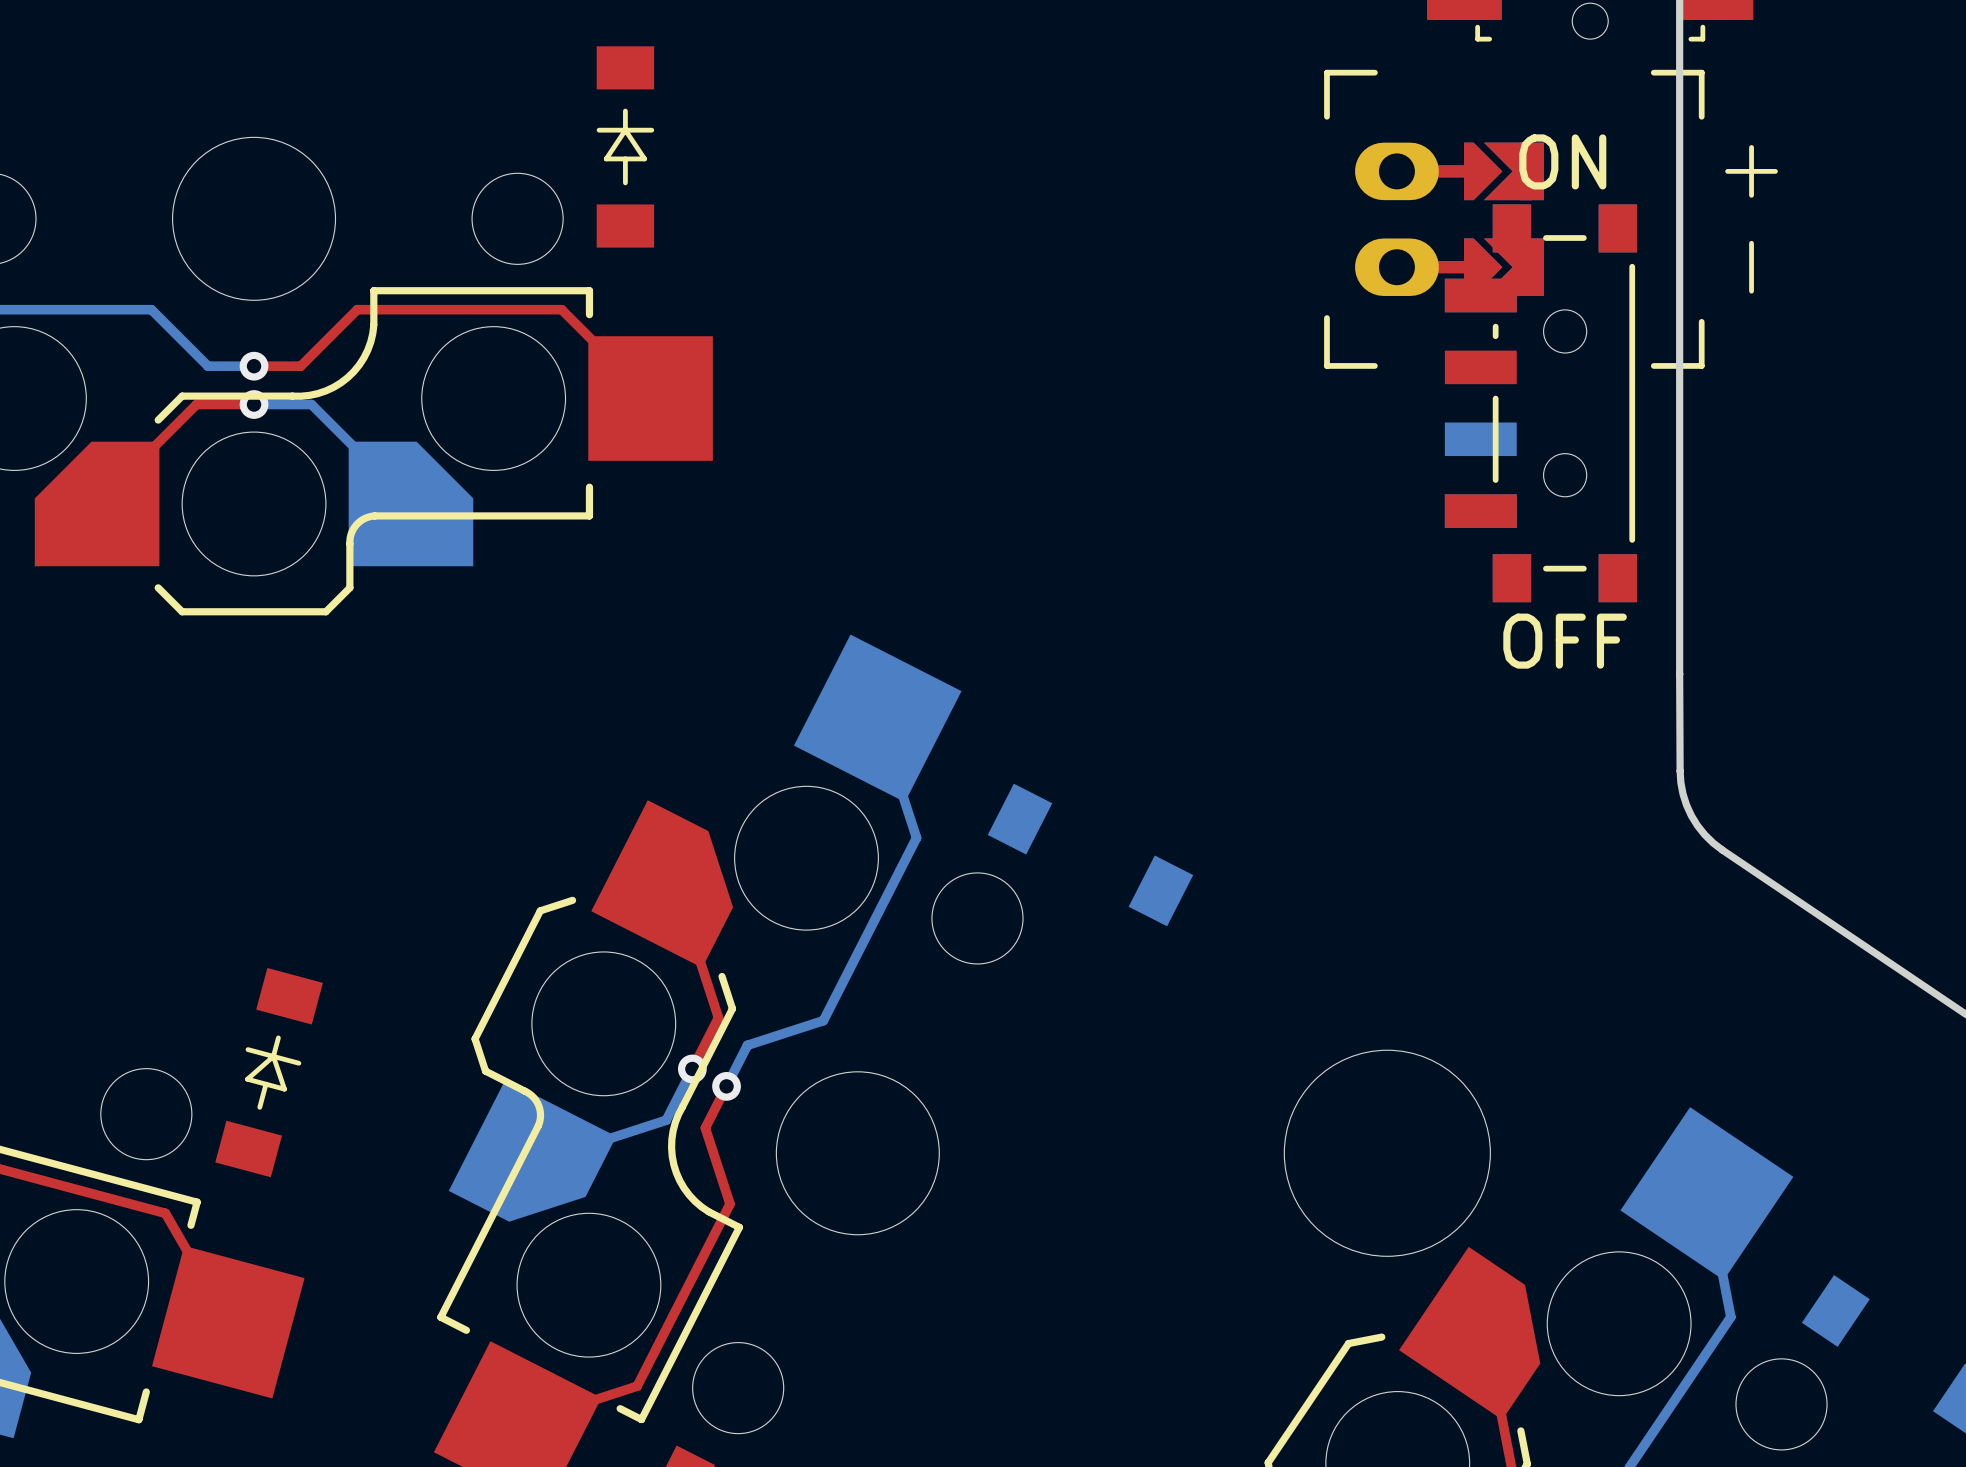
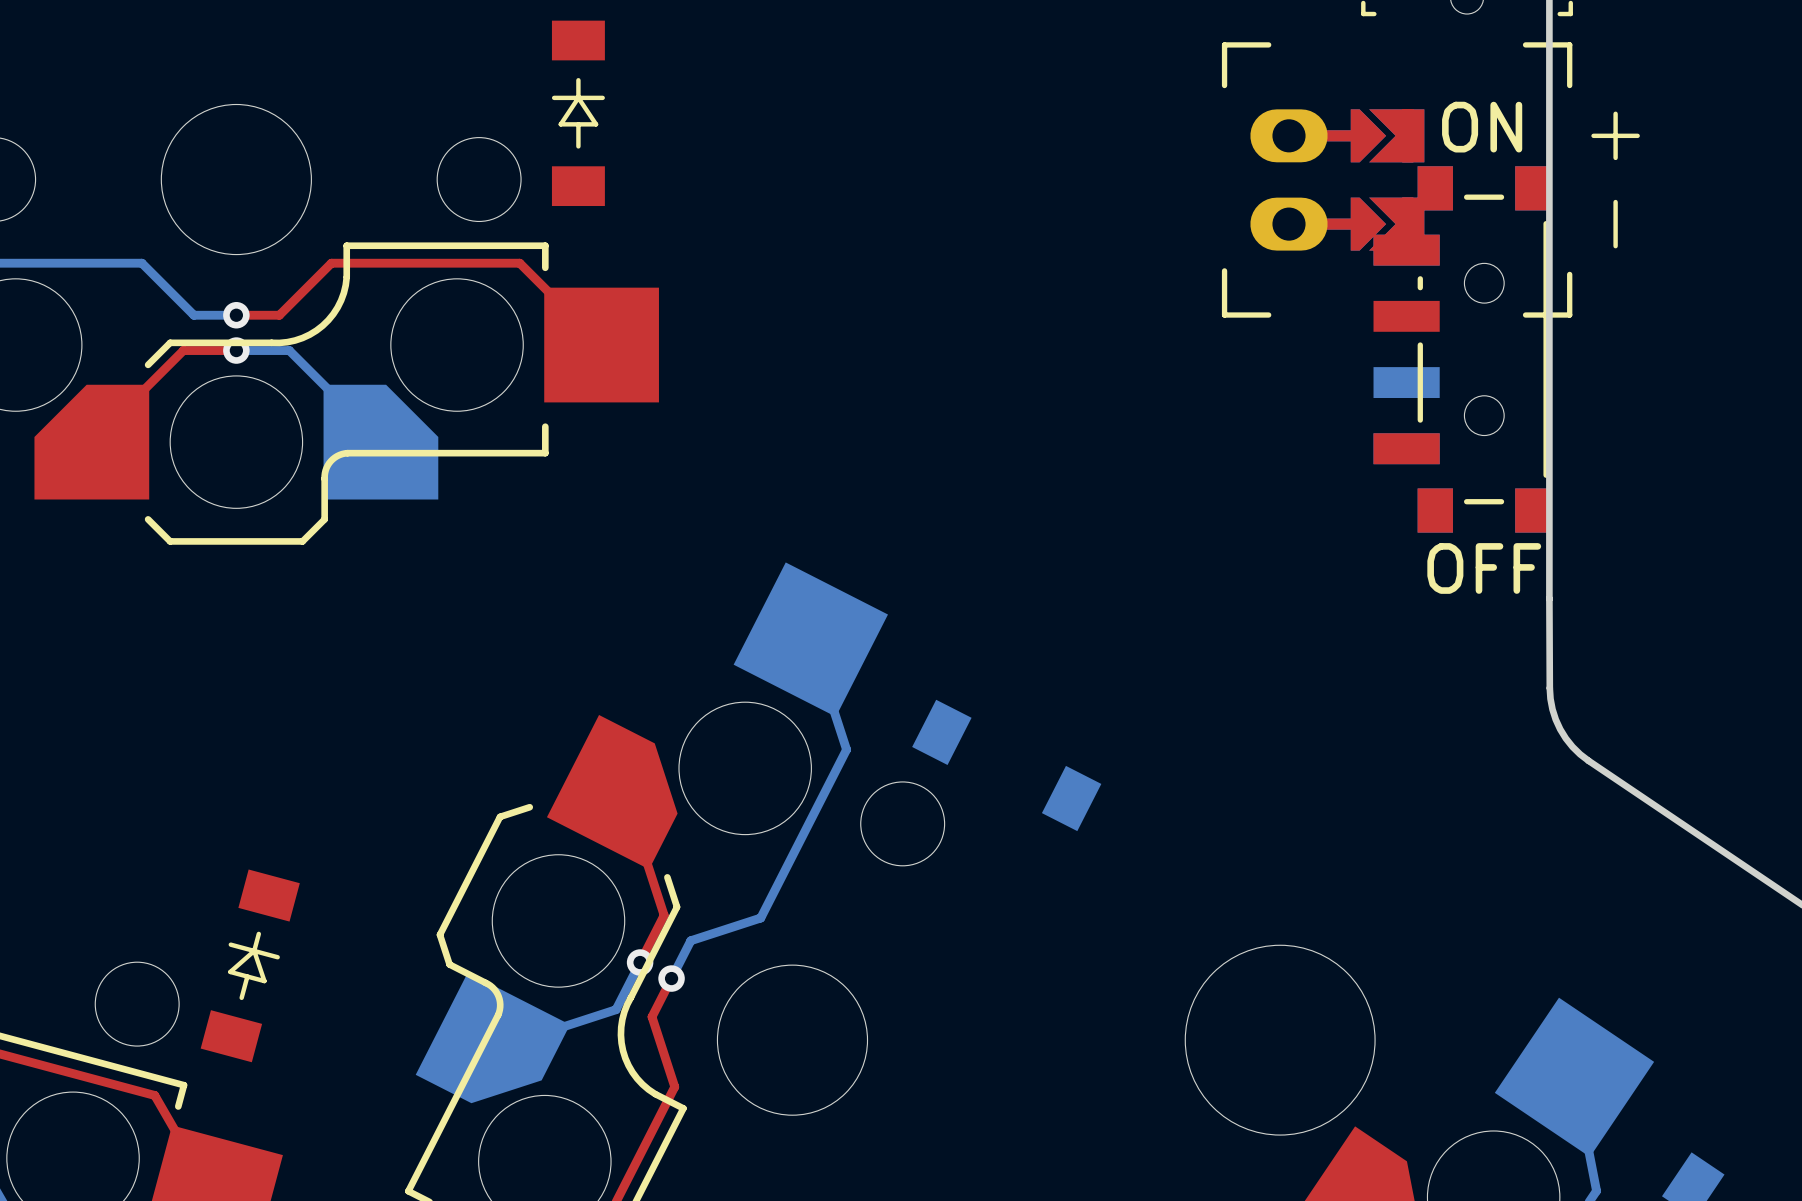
part position: (1540, 403) -> (1462, 349)

